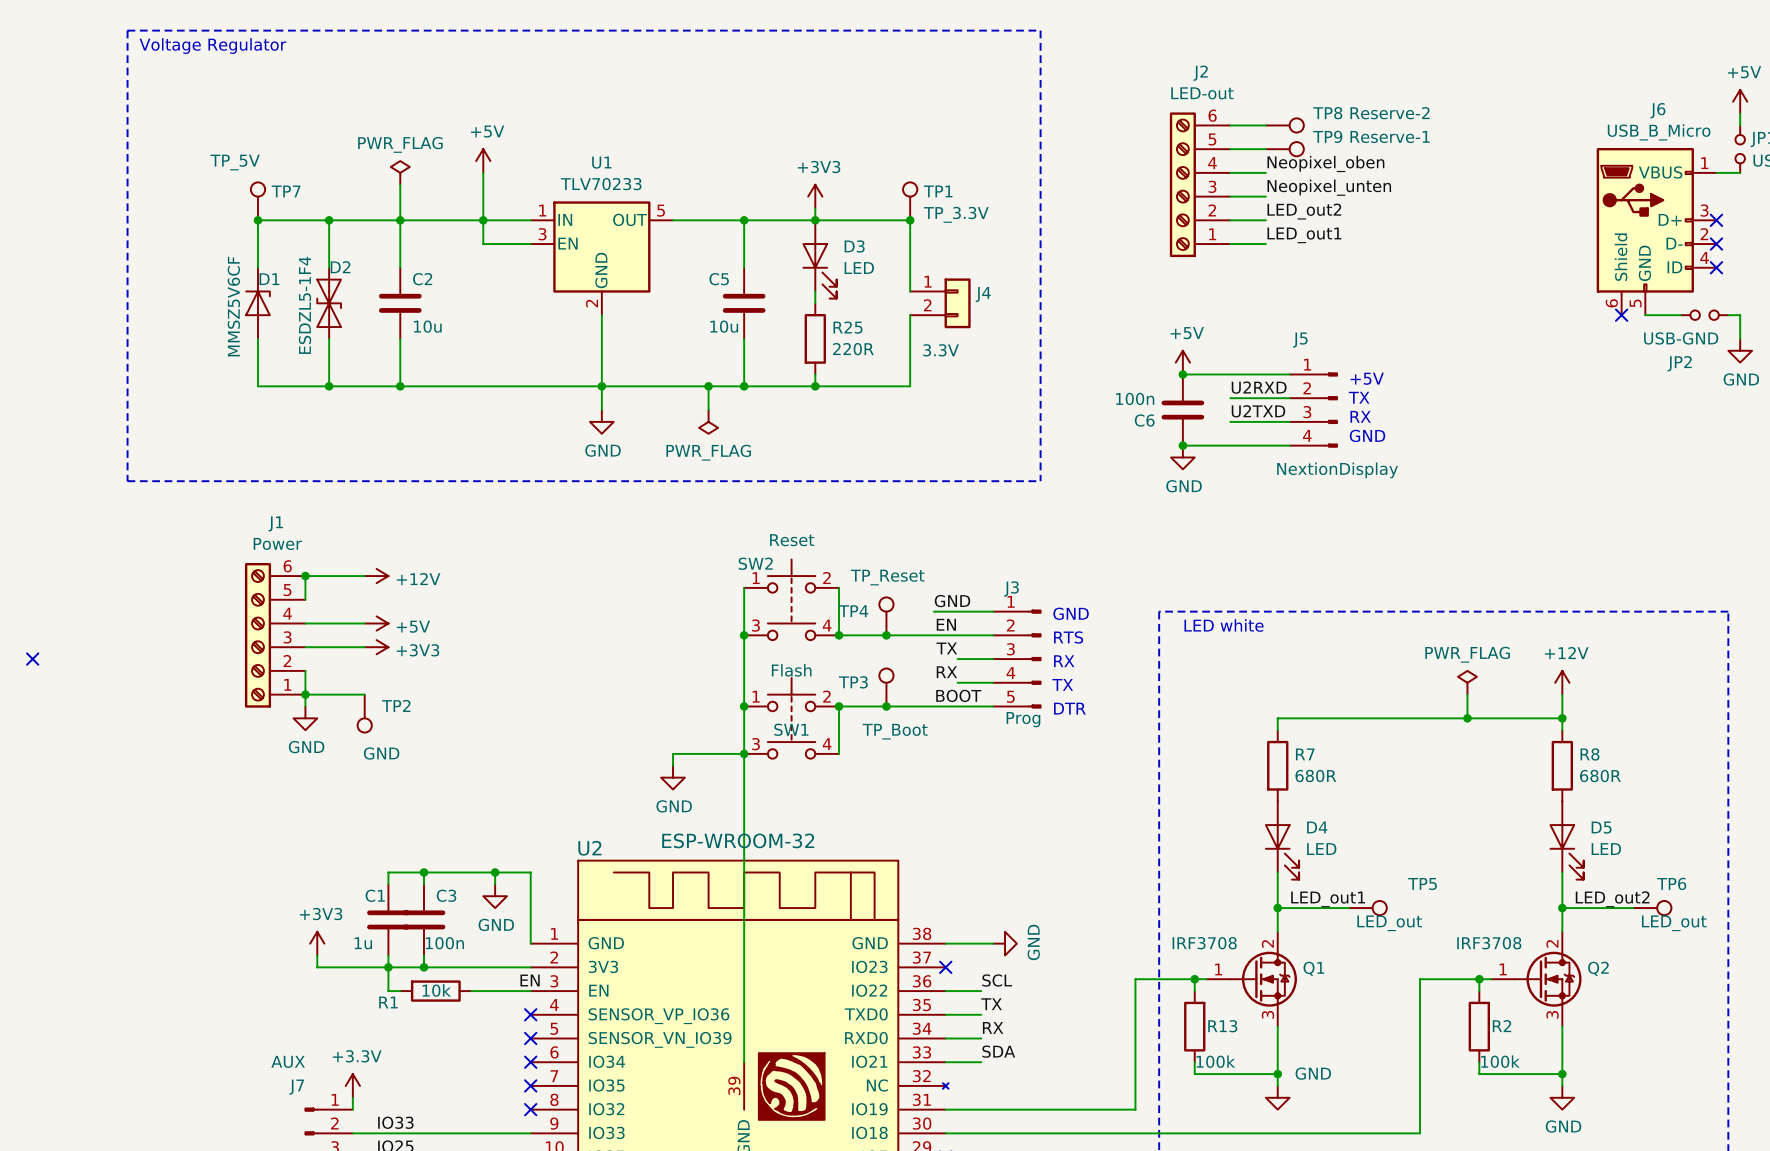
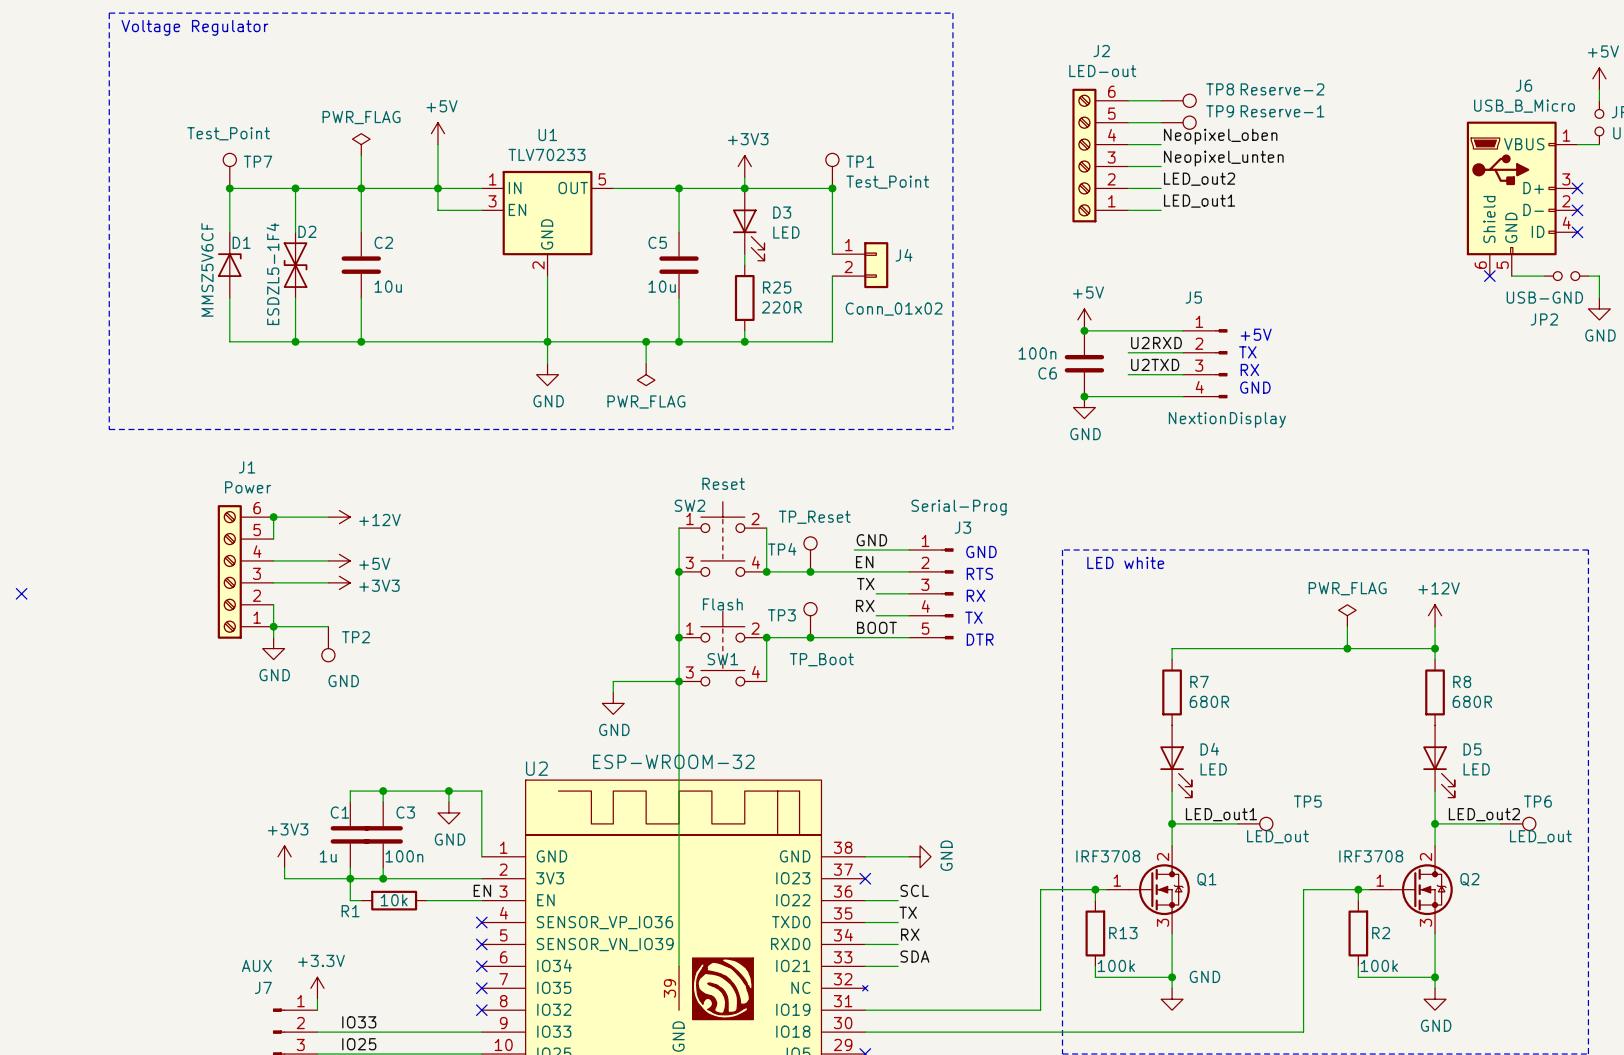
TP7 value: TP_5V (235, 162) -> Test_Point (228, 133)
TP1 value: TP_3.3V (956, 214) -> Test_Point (887, 182)
J4 value: 3.3V (941, 350) -> Conn_01x02 (894, 309)
J3 name position: J3 (1011, 588) -> J3 (962, 527)
J3 value: Prog (1023, 719) -> Serial-Prog (959, 507)

